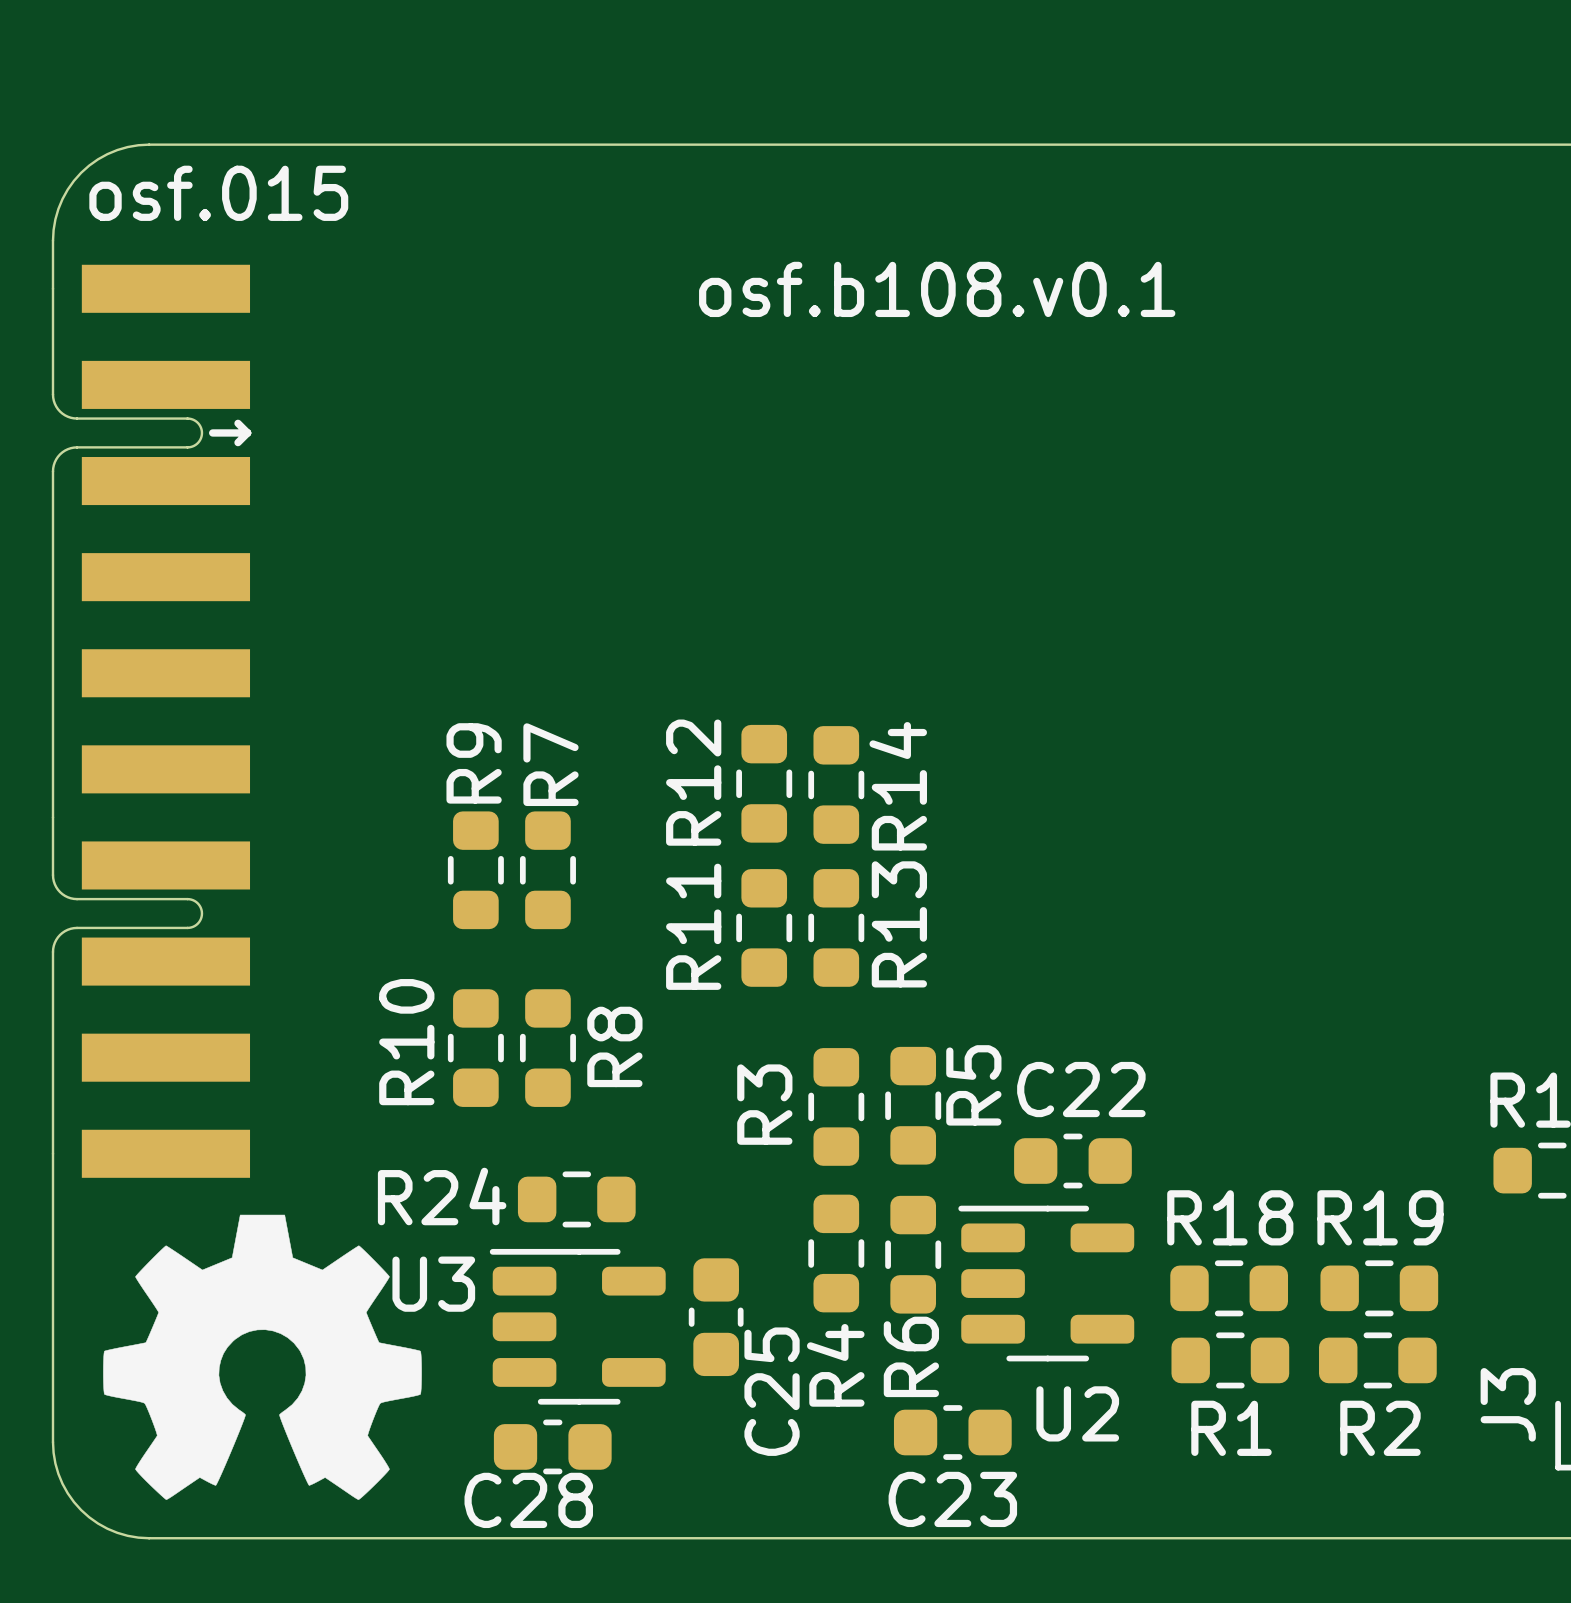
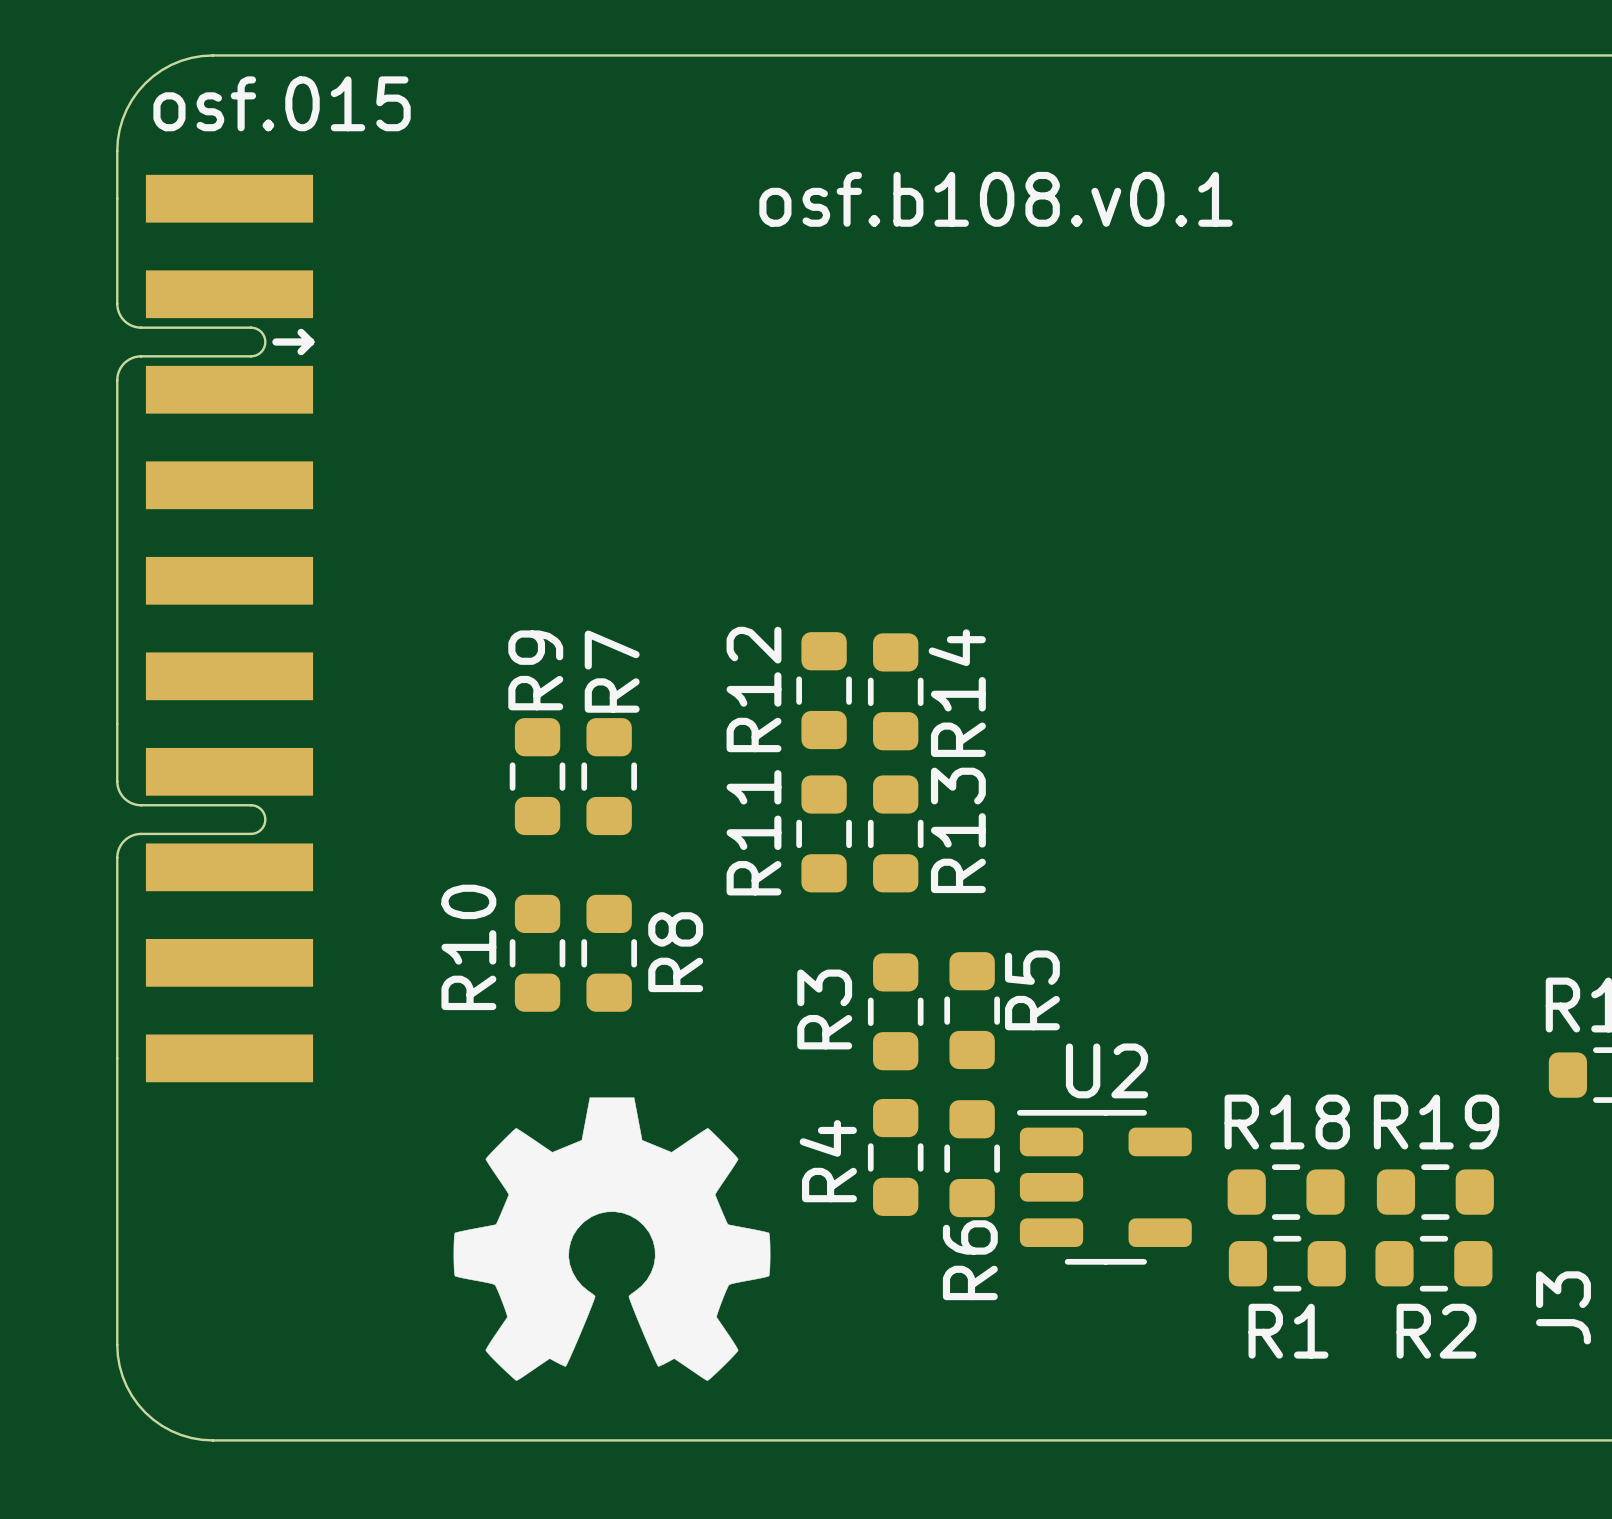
C22: (1072, 1161) -> none
R24: (576, 1199) -> none
C25: (716, 1317) -> none
U3: (577, 1326) -> none
drawing position: (262, 1357) -> (612, 1239)
R4 name position: R4 (835, 1365) -> R4 (828, 1161)
U2 name position: U2 (1077, 1413) -> U2 (1106, 1070)
C23: (952, 1432) -> none
C28: (552, 1446) -> none

